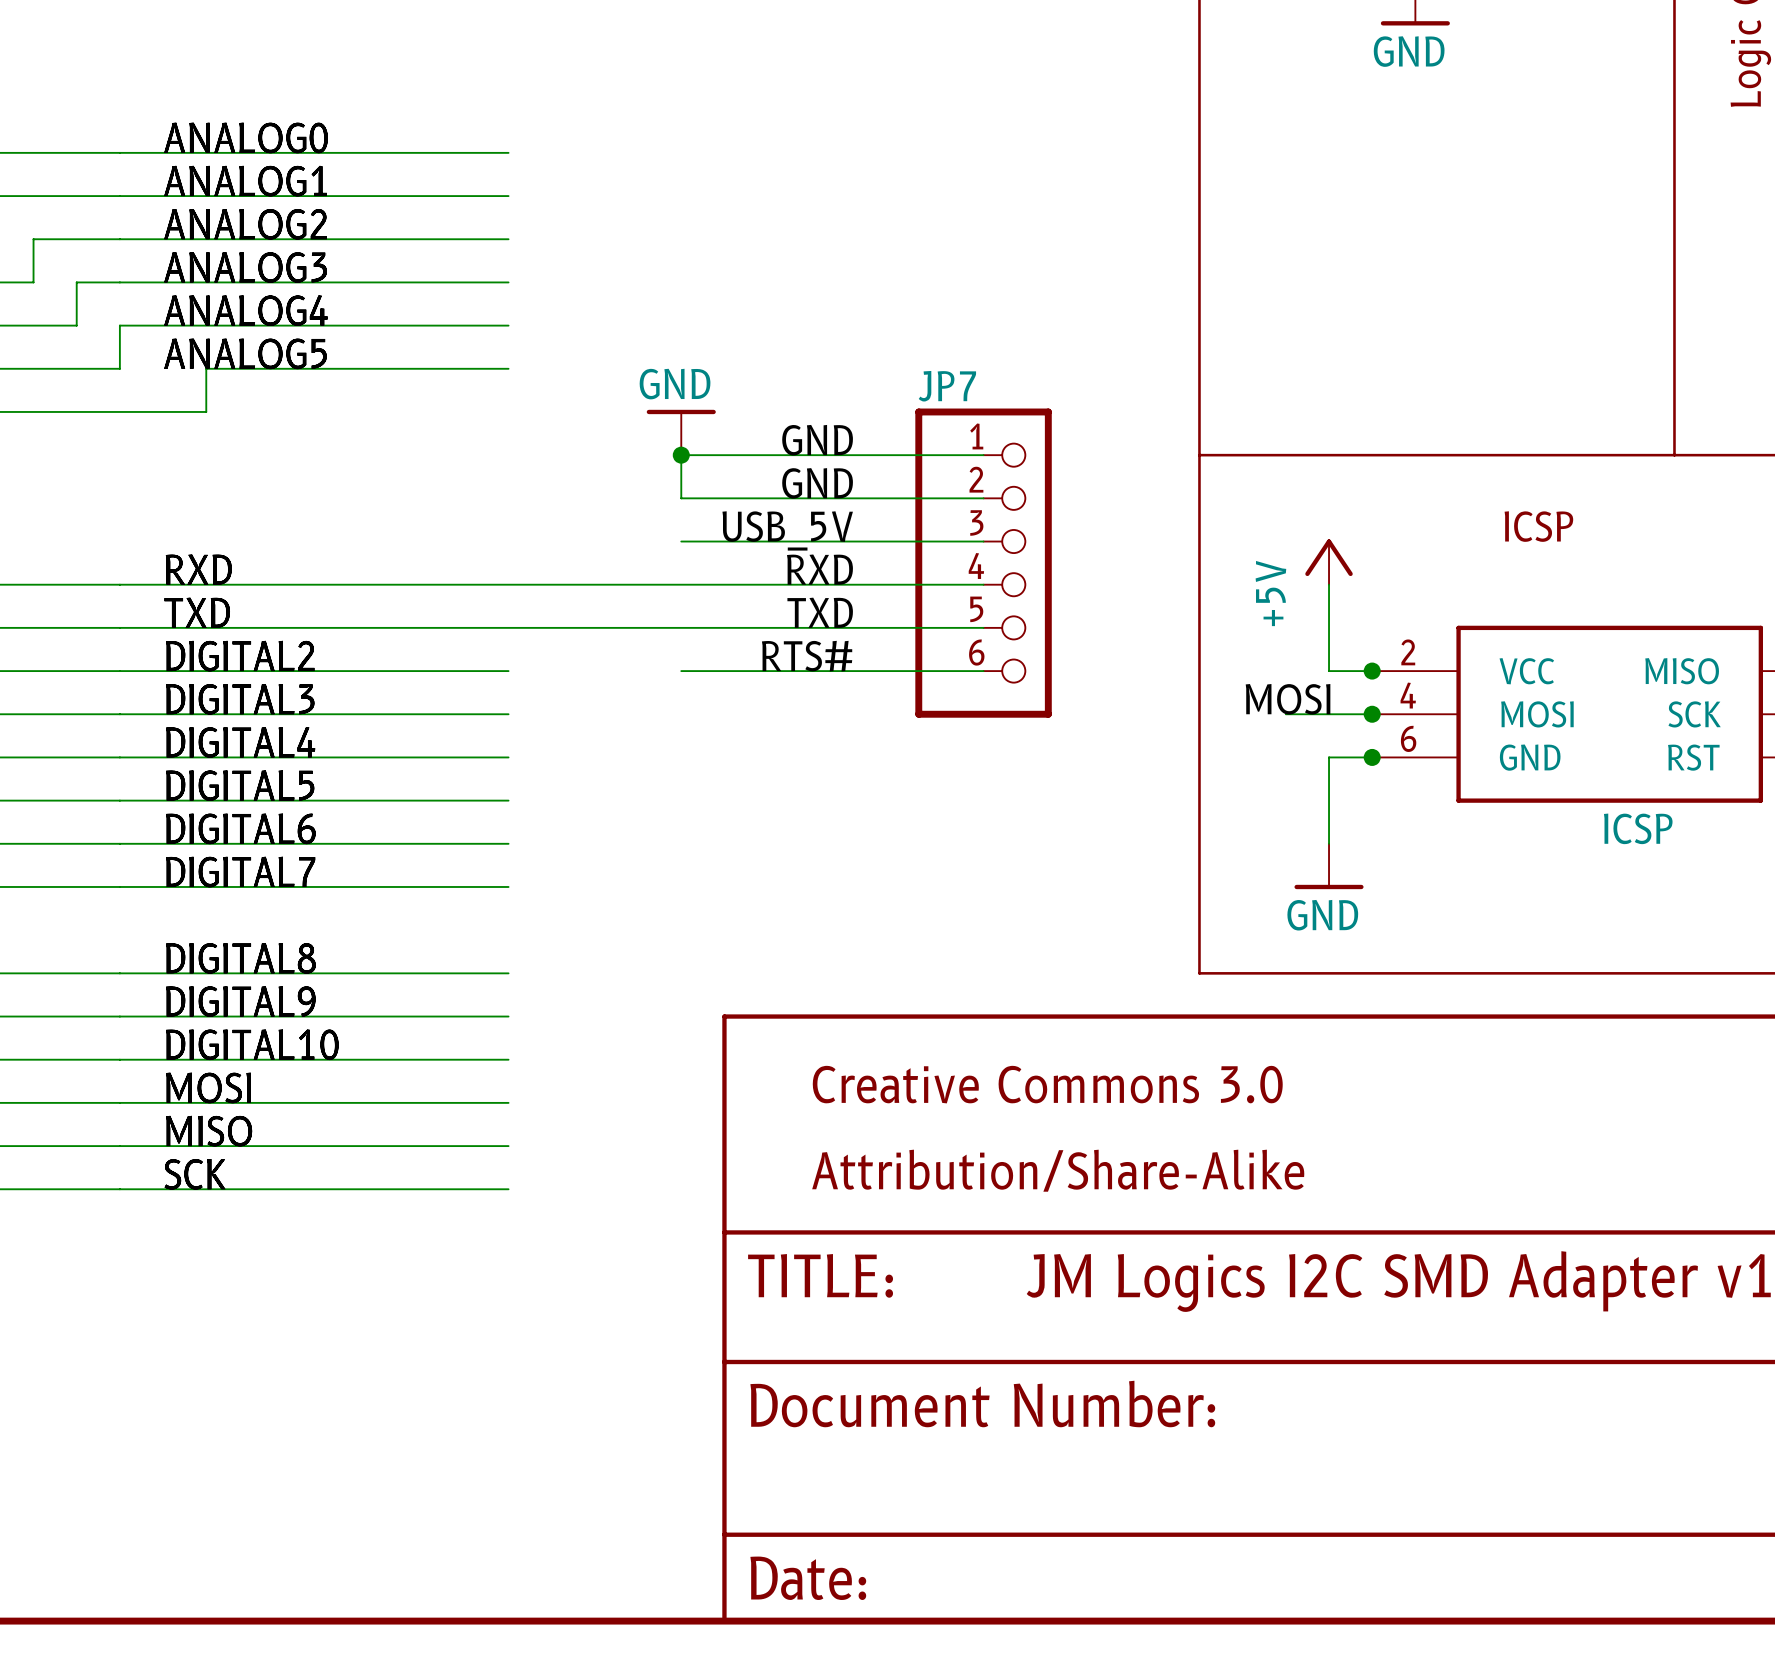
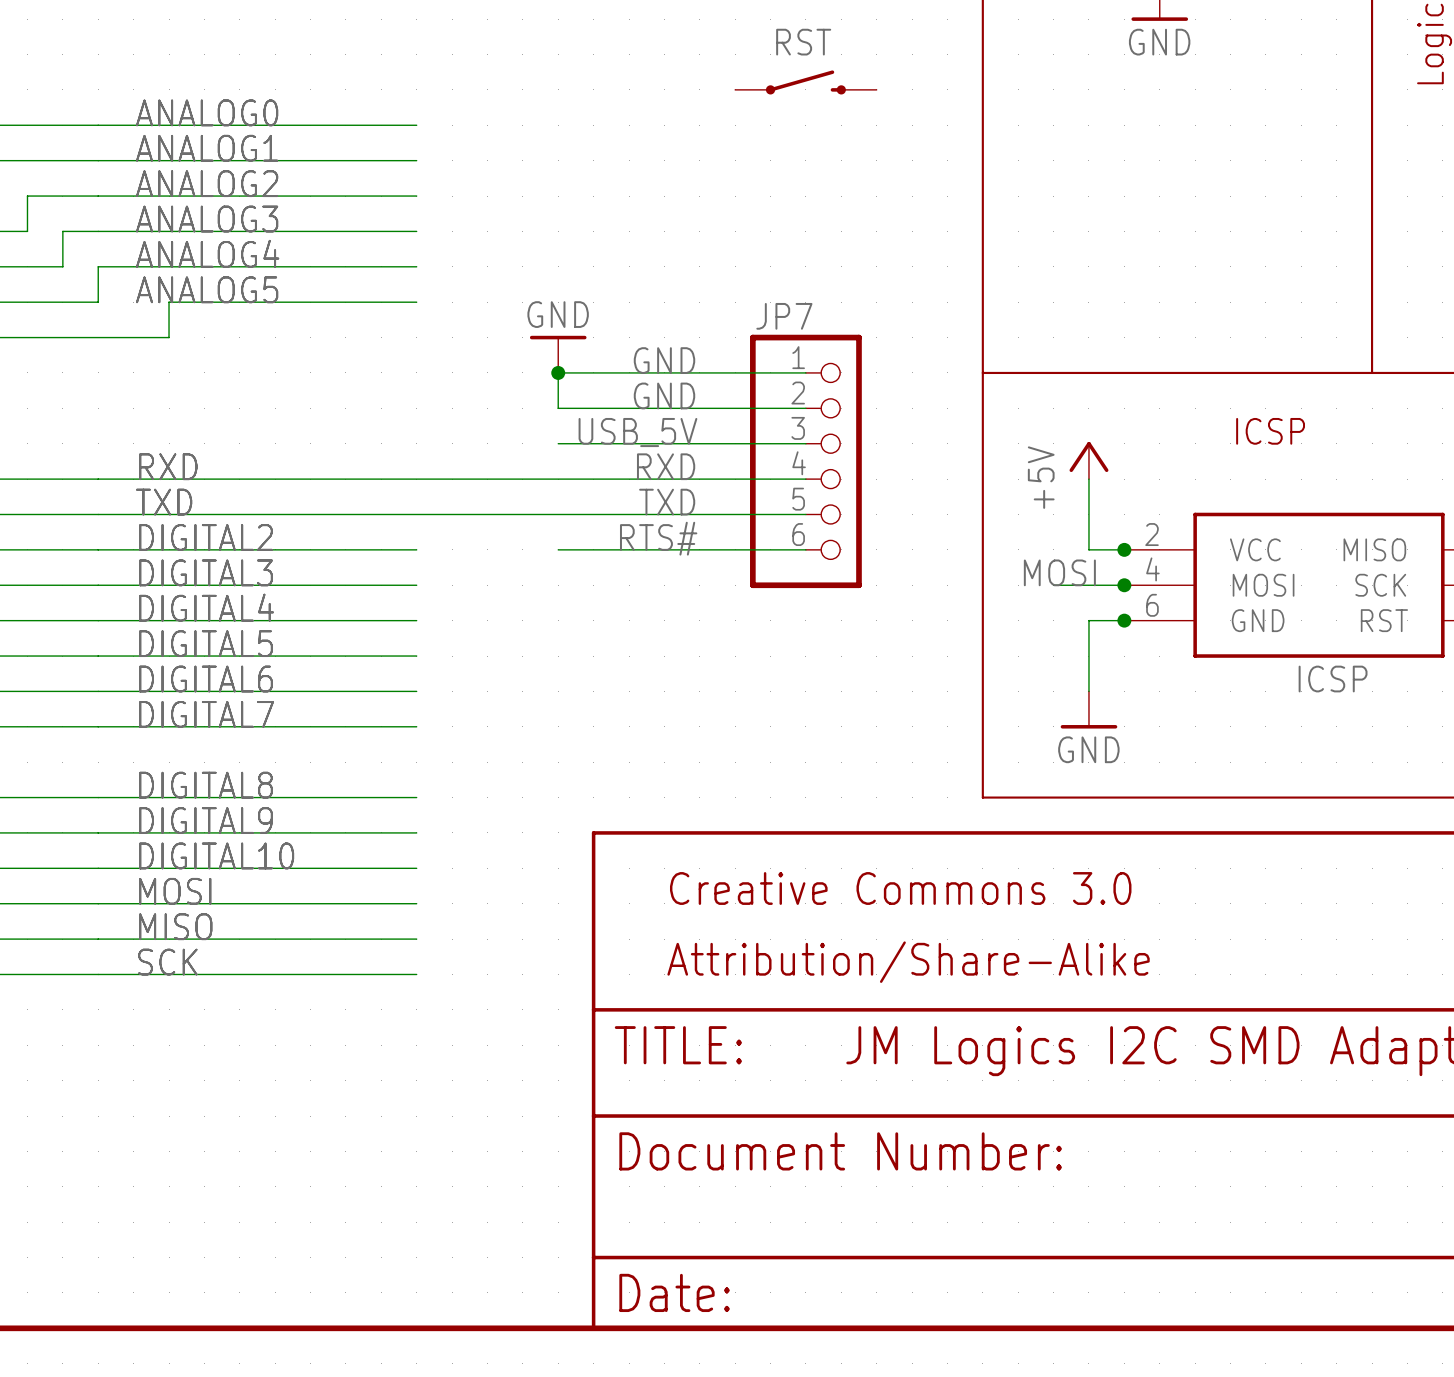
RST: none -> (805, 82)

